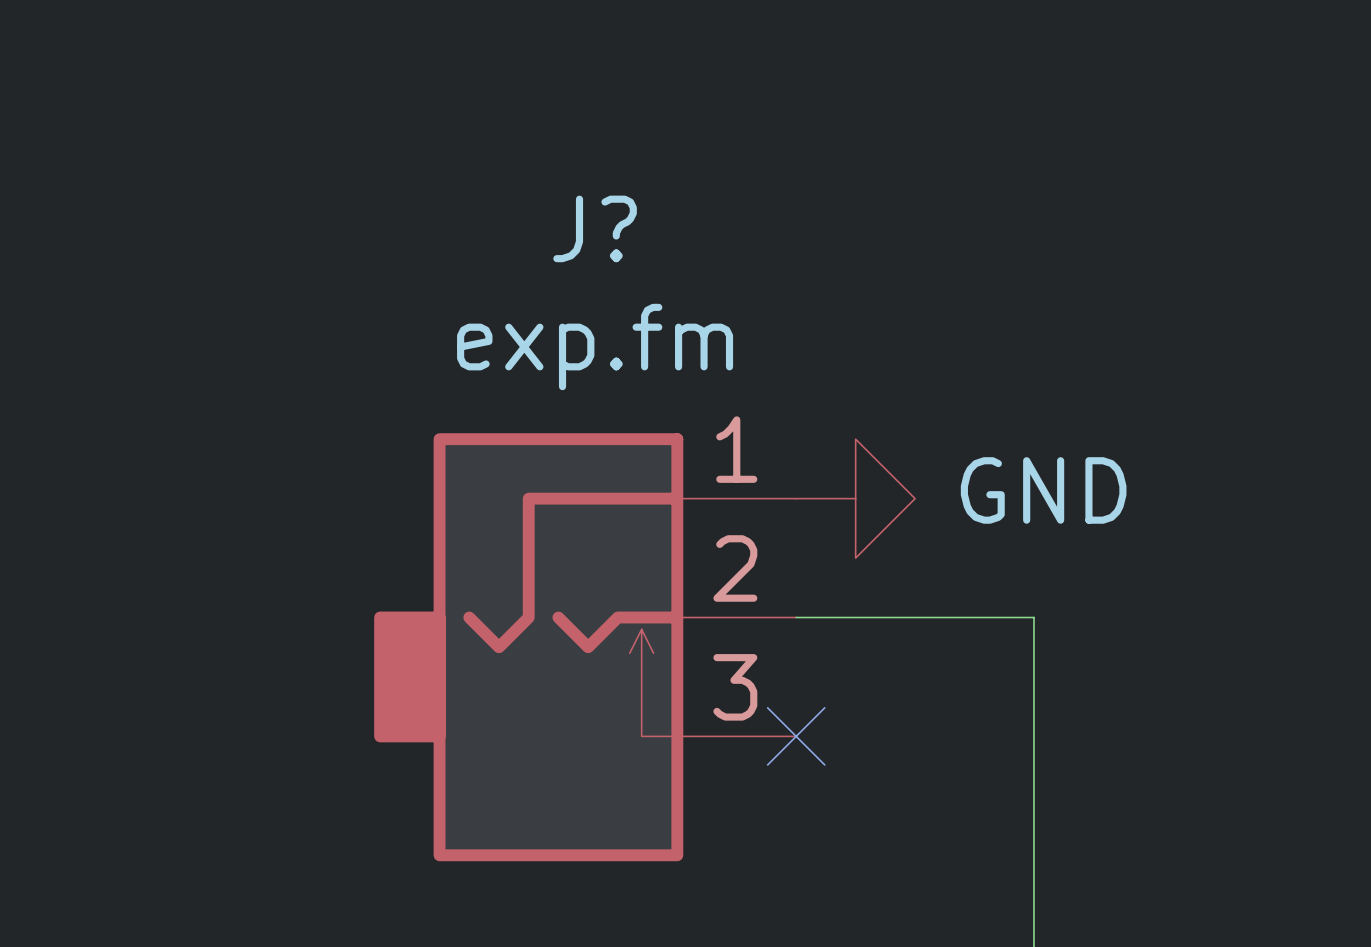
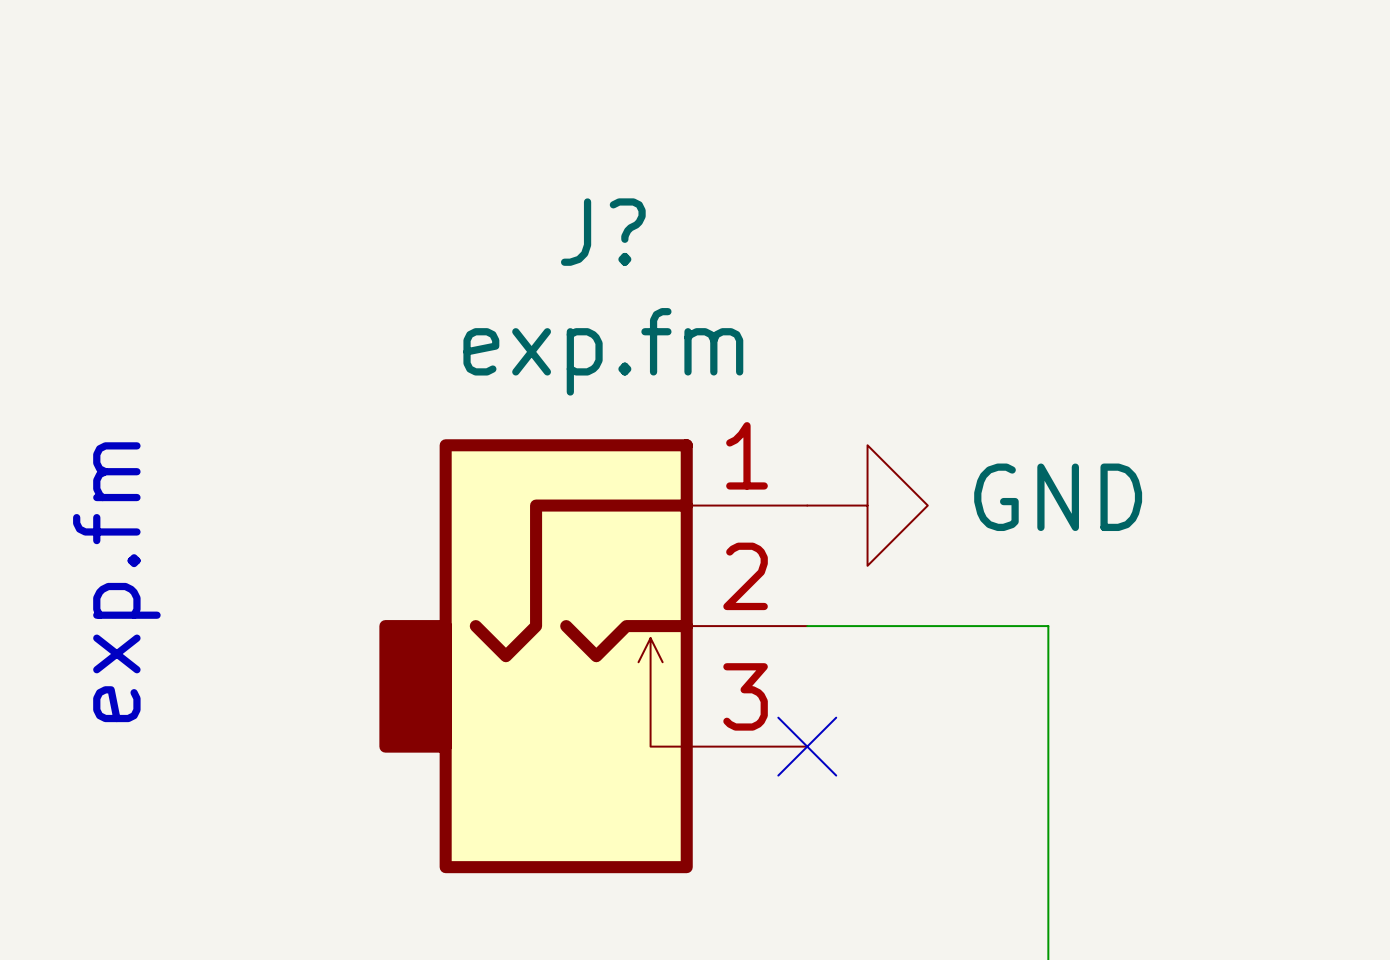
text: none -> exp.fm (116, 582)

